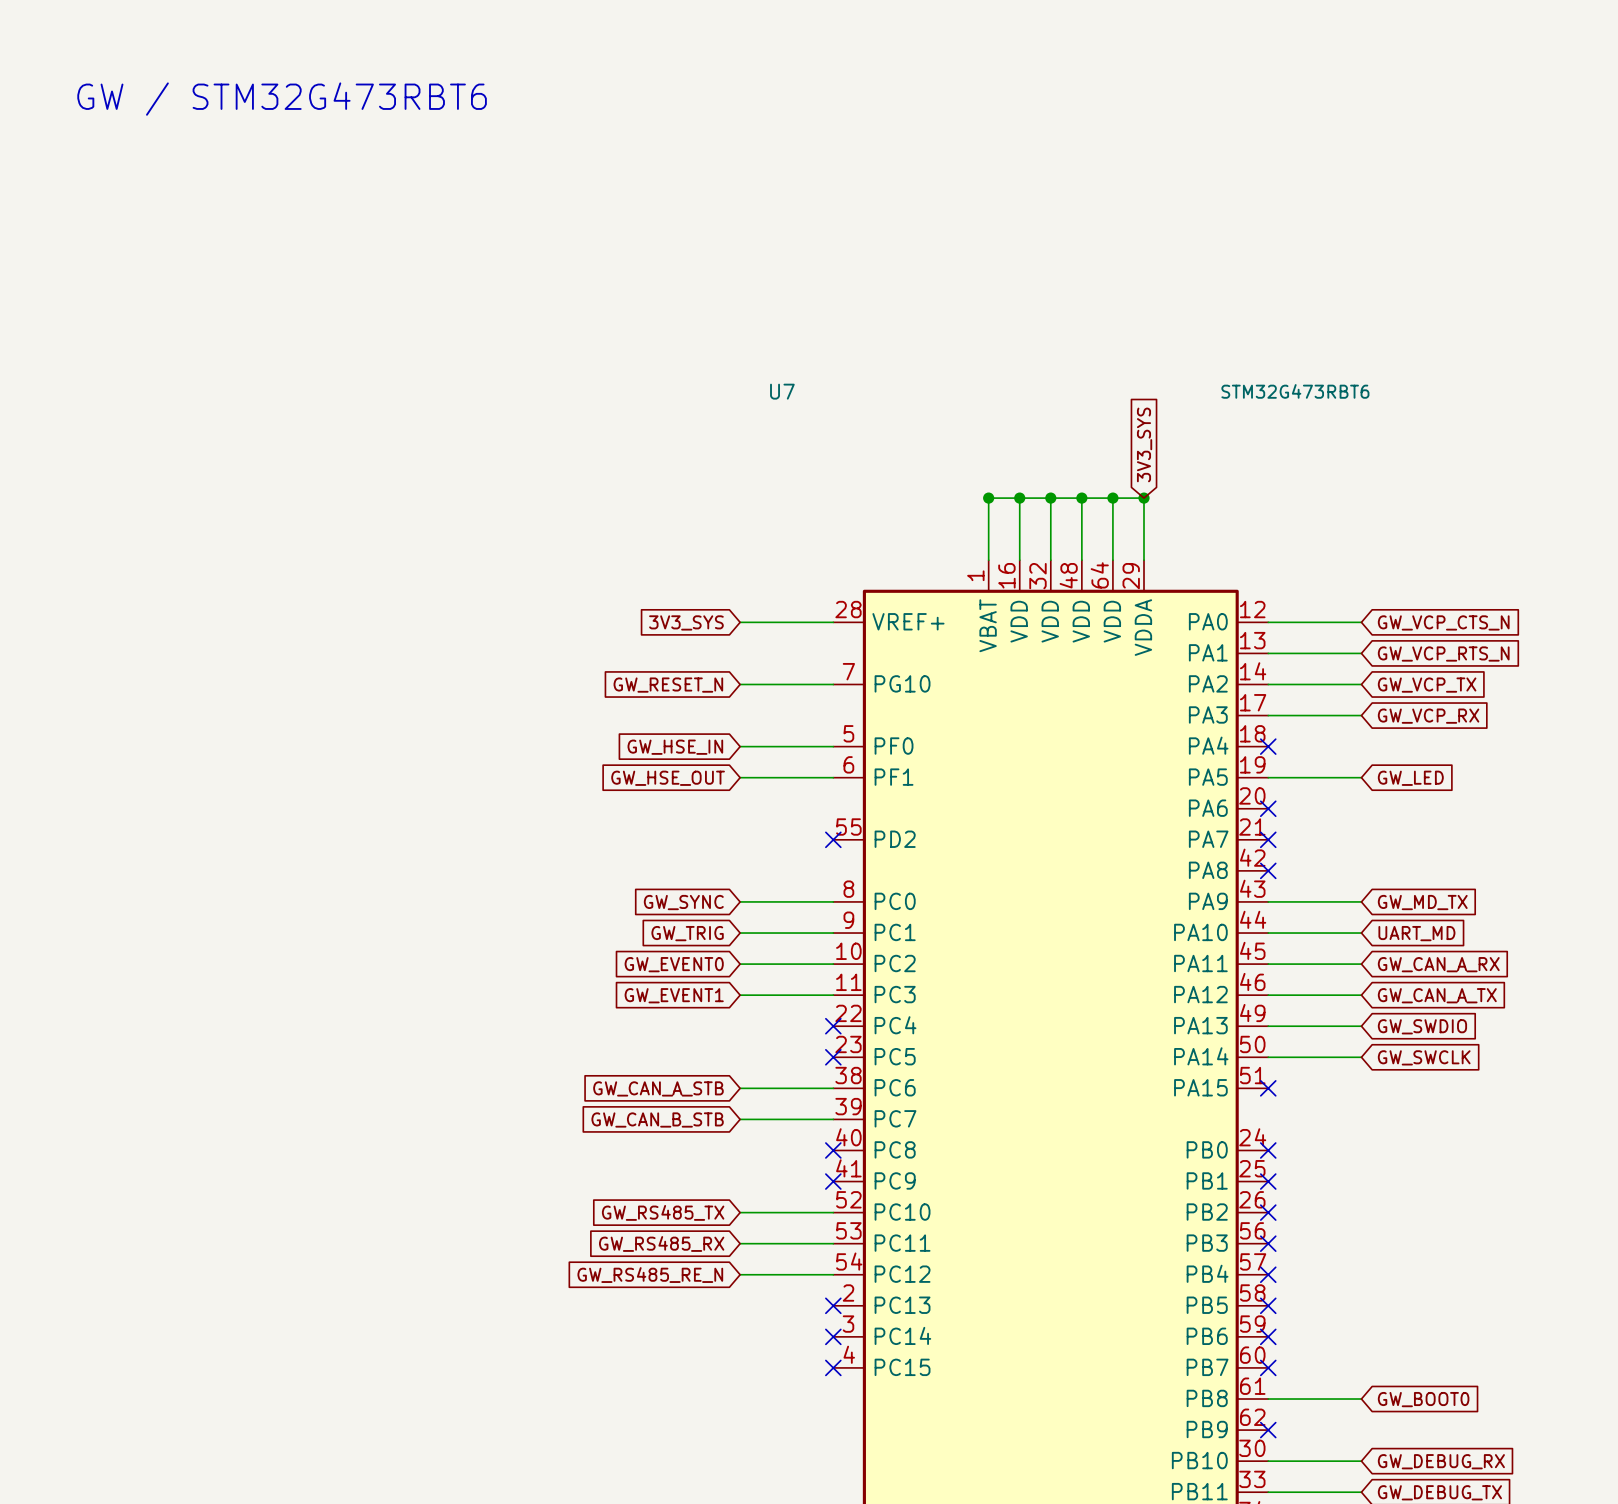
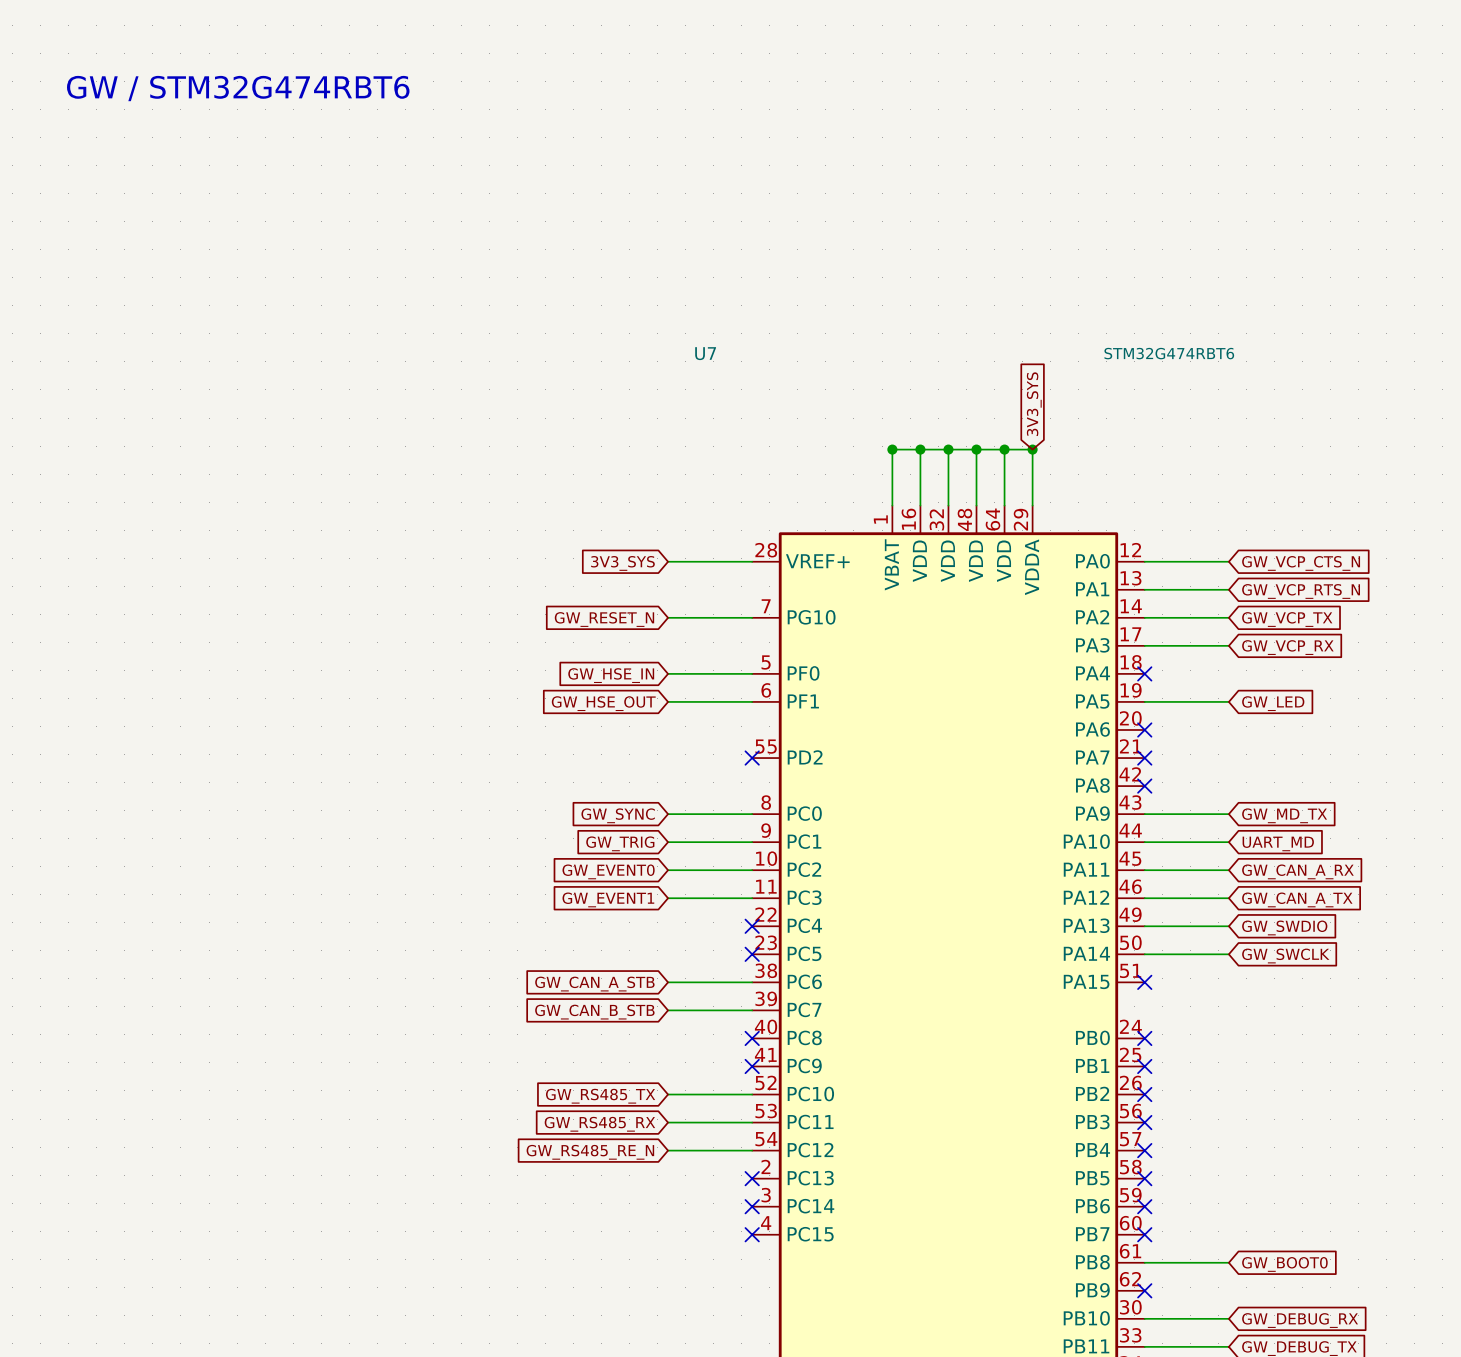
text: GW / STM32G473RBT6 (282, 99) -> GW / STM32G474RBT6 (238, 88)
U7 value: STM32G473RBT6 (1295, 391) -> STM32G474RBT6 (1169, 353)

